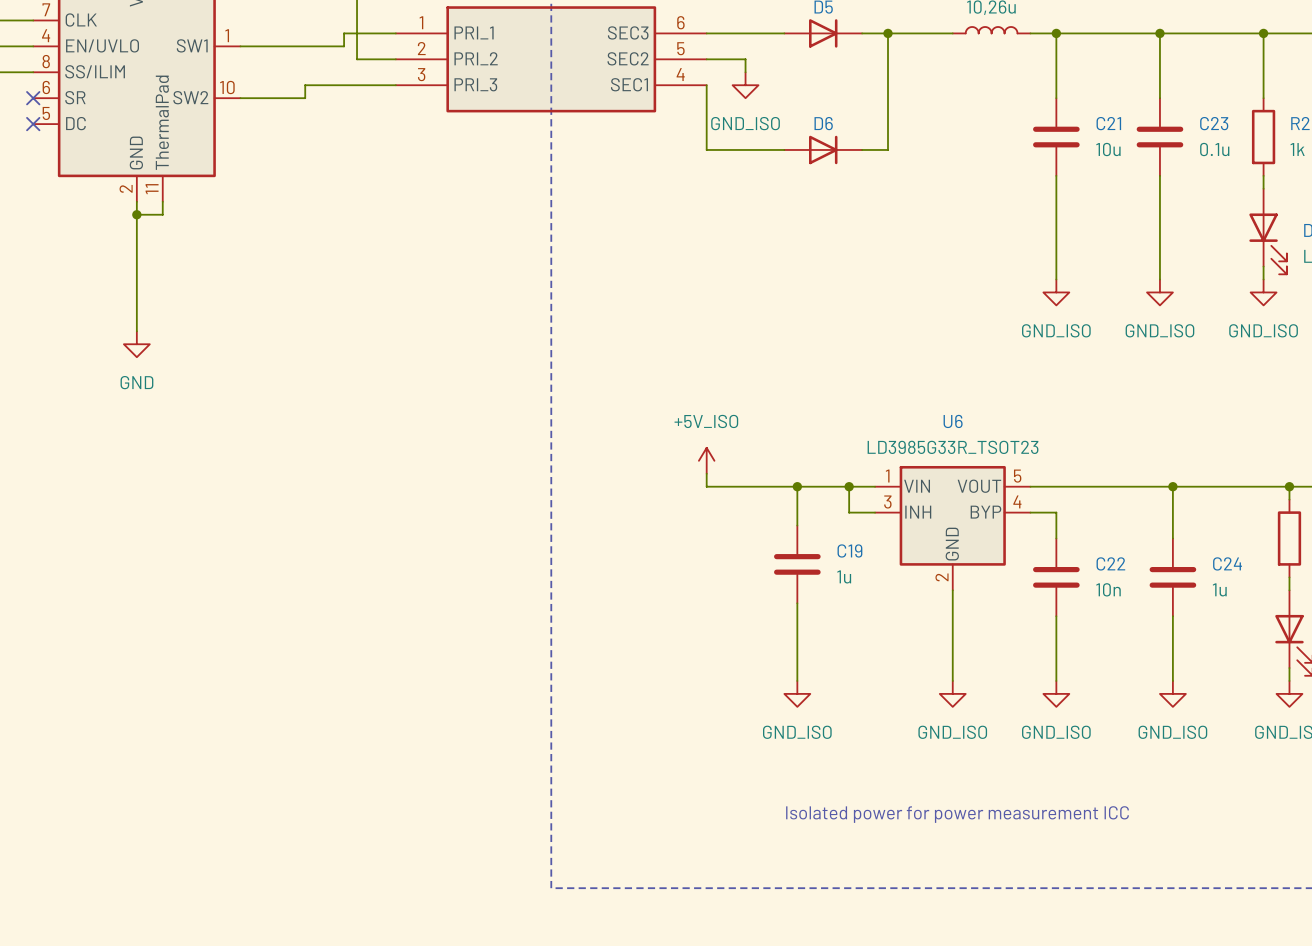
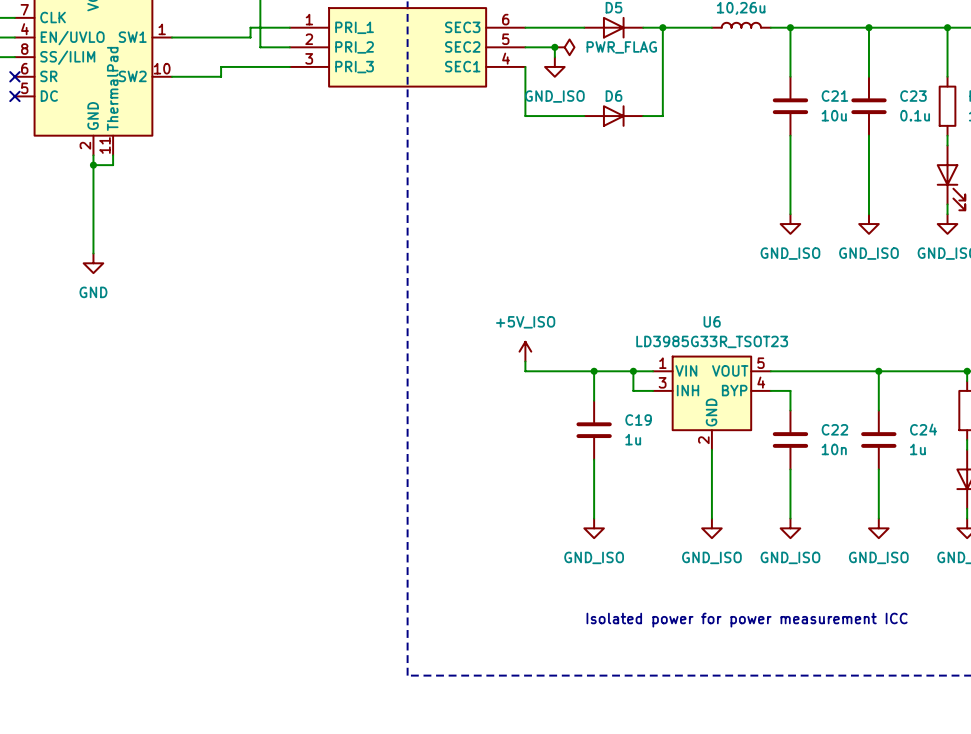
junction: none -> (554, 47)
power symbol: none -> PWR_FLAG (564, 47)

